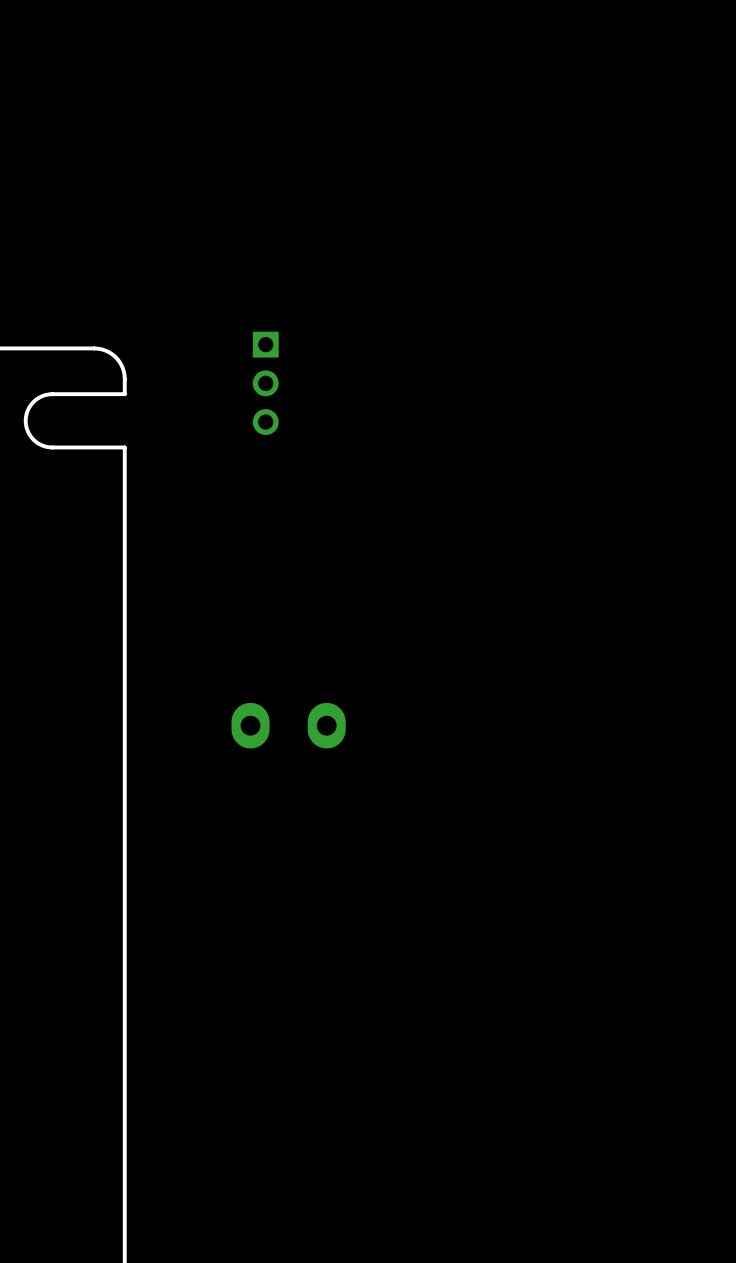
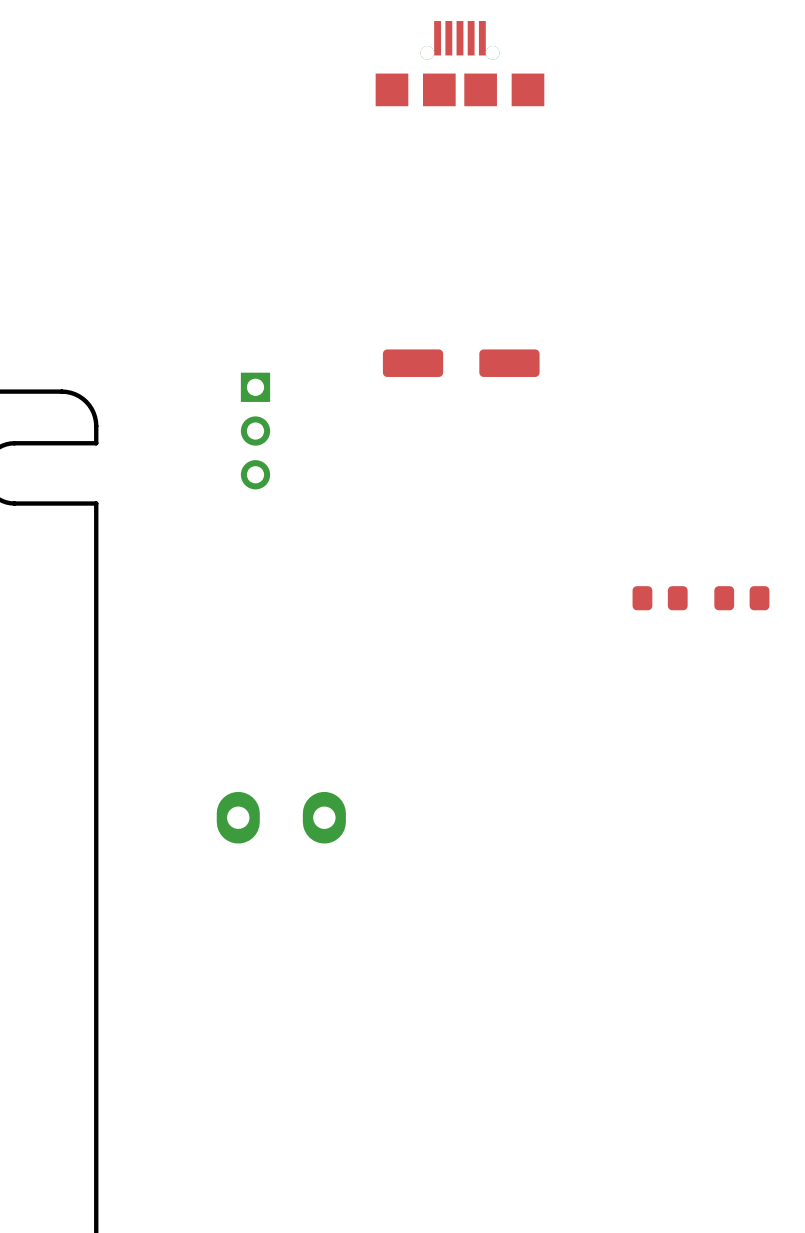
part: none -> (459, 63)
part: none -> (461, 363)
part: none -> (660, 598)
part: none -> (741, 598)

